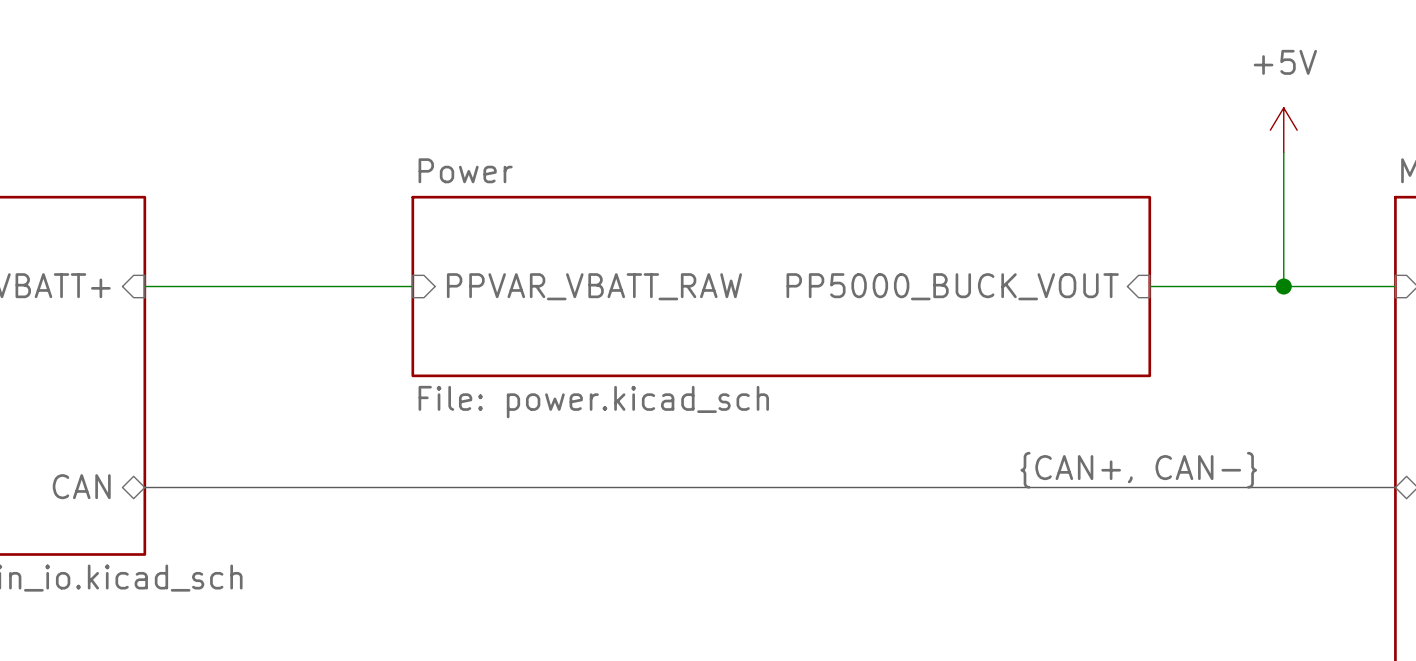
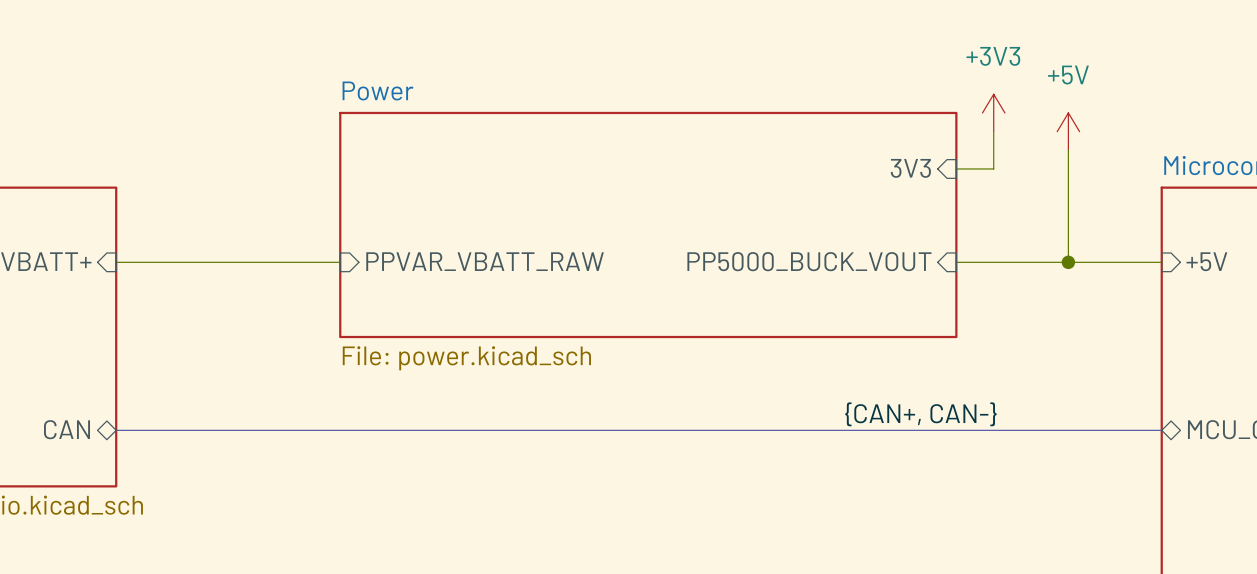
power symbol: none -> +3V3 (993, 112)
wire: none -> (993, 131) (993, 168) (956, 168)
sheet pin: none -> 3V3 (910, 168)
sheet Power: none -> File: power.kicad_sch (648, 224)
sheet Power: File: power.kicad_sch (781, 286) -> none

